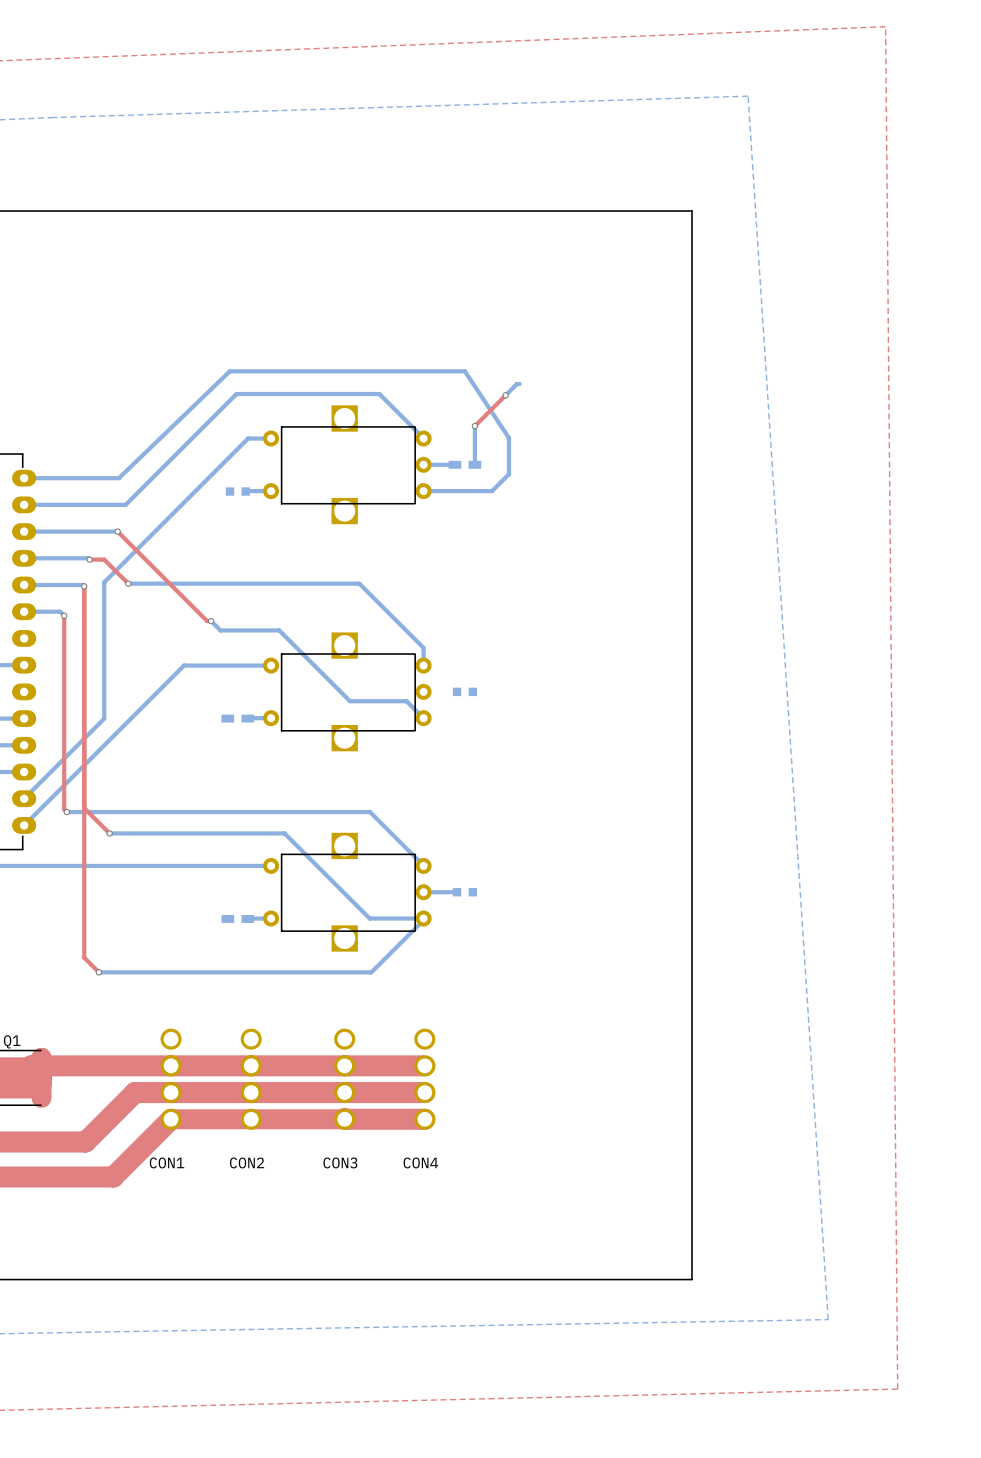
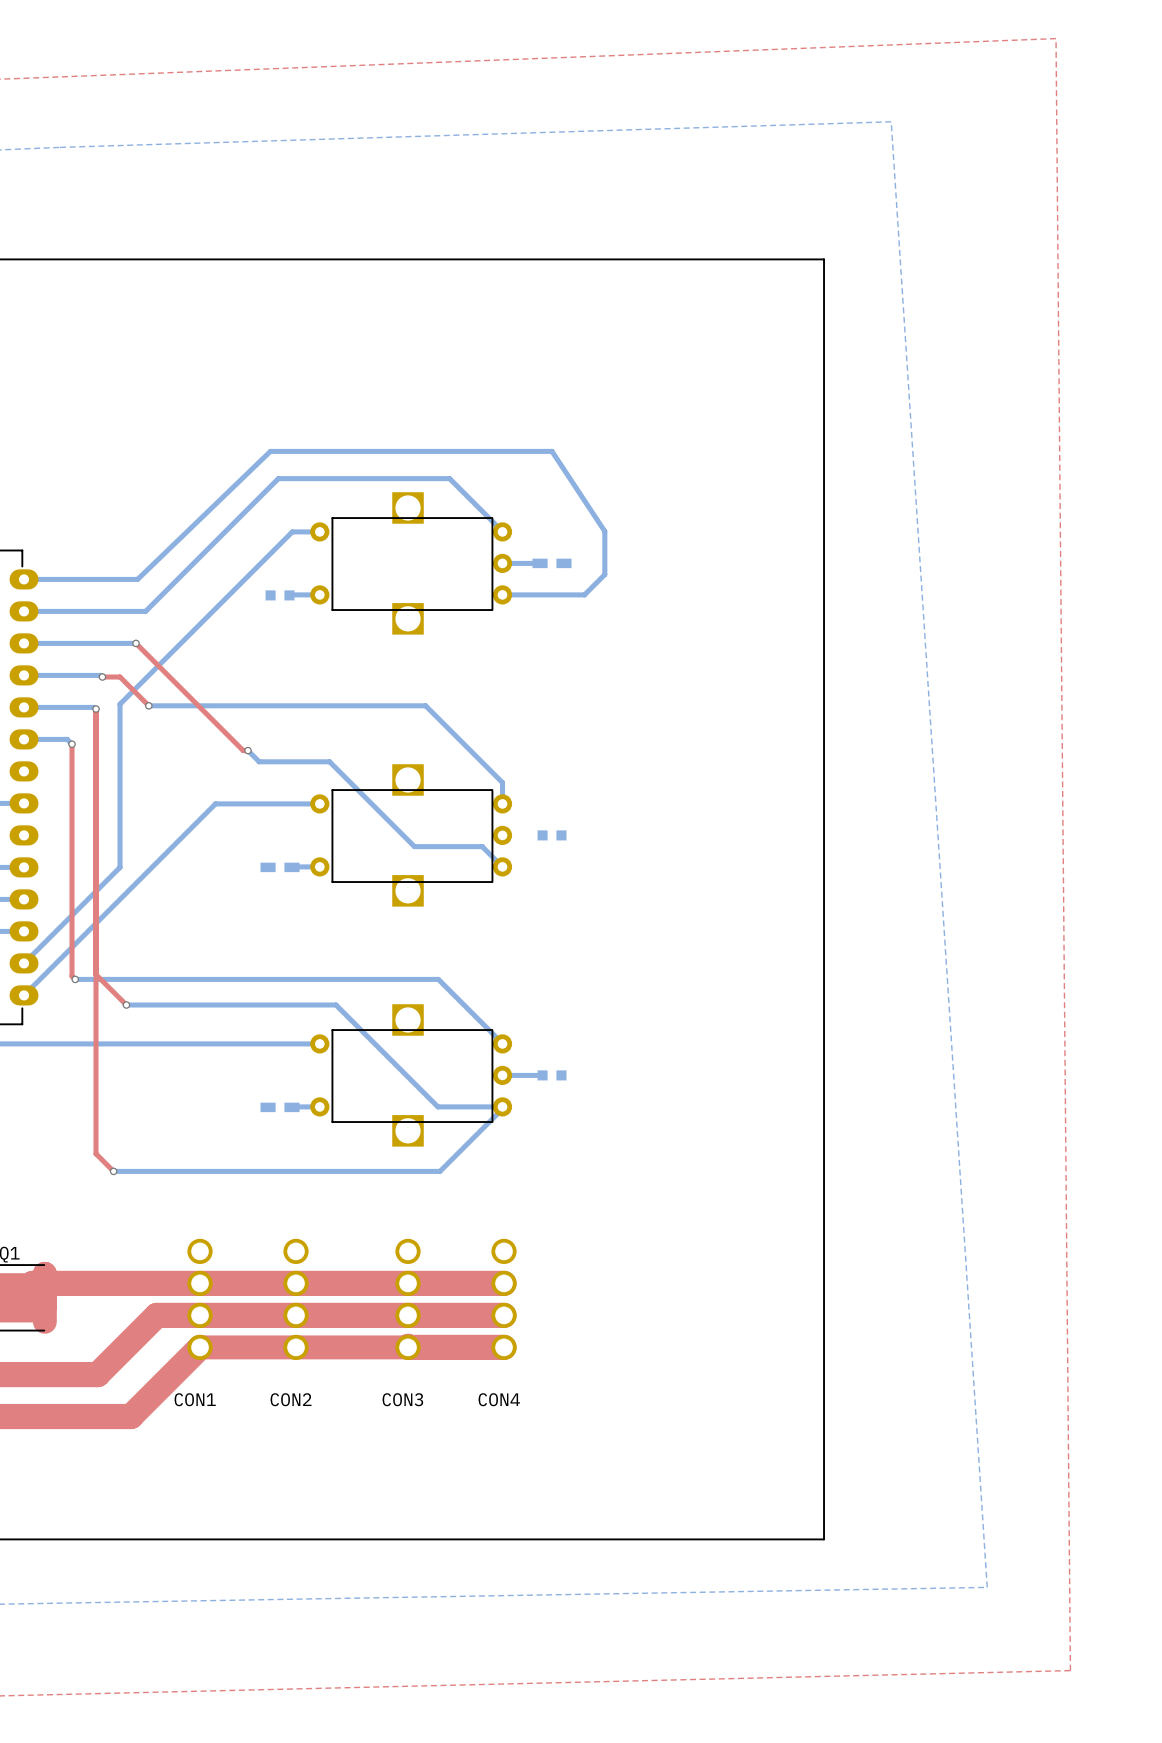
bottom track: (519, 384) (517, 384) (505, 395) -> none
top track: (505, 395) (474, 426) -> none
via: (505, 395) -> none
bottom track: (474, 426) (474, 464) -> none
via: (474, 426) -> none

